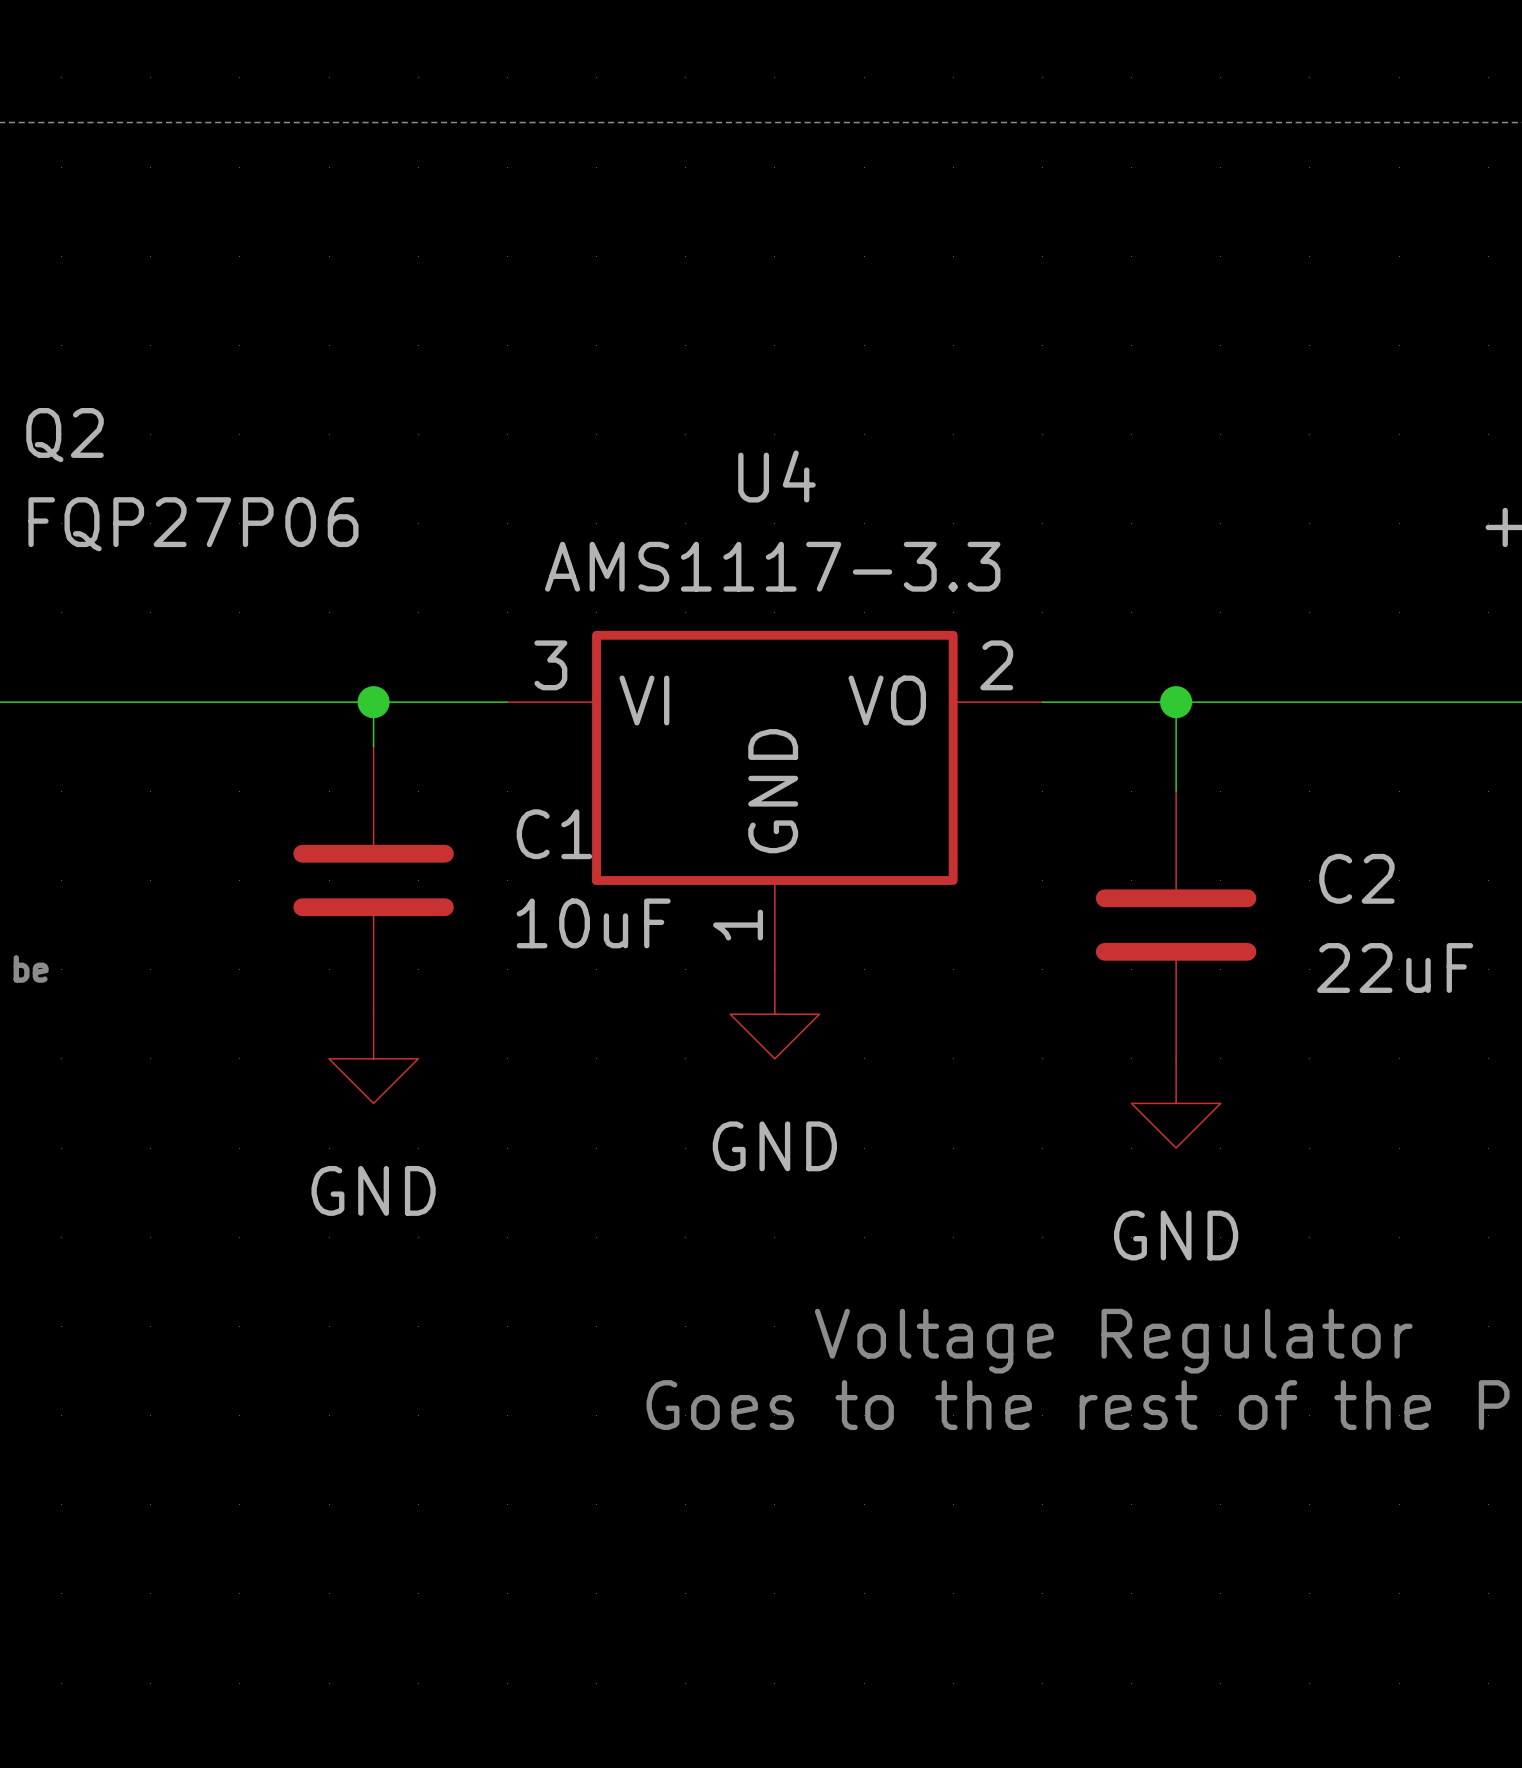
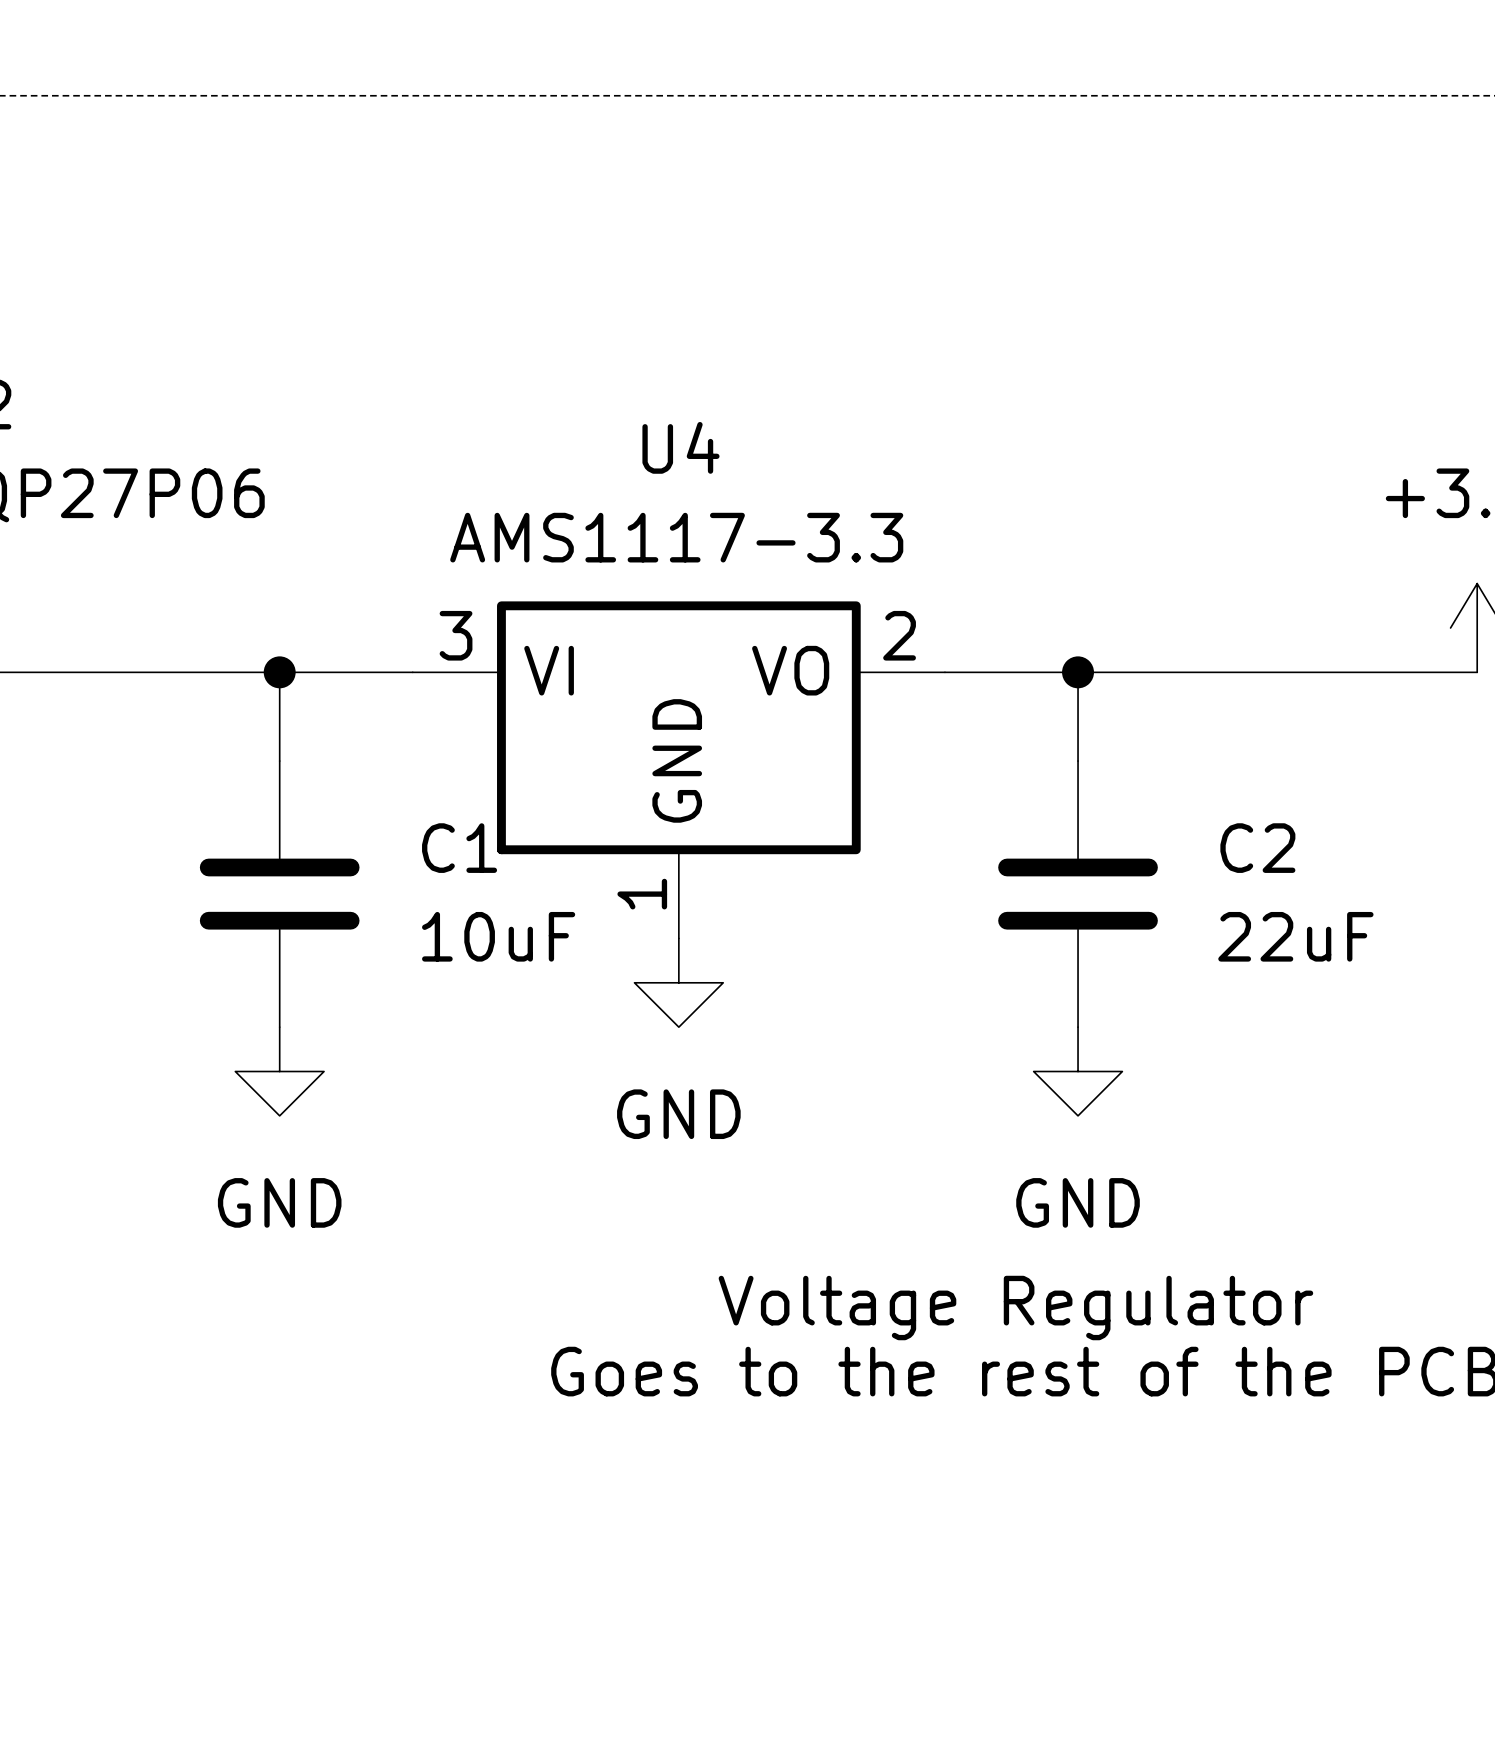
C1 position: (373, 880) -> (279, 894)
power symbol position: GND (373, 1058) -> GND (279, 1071)

